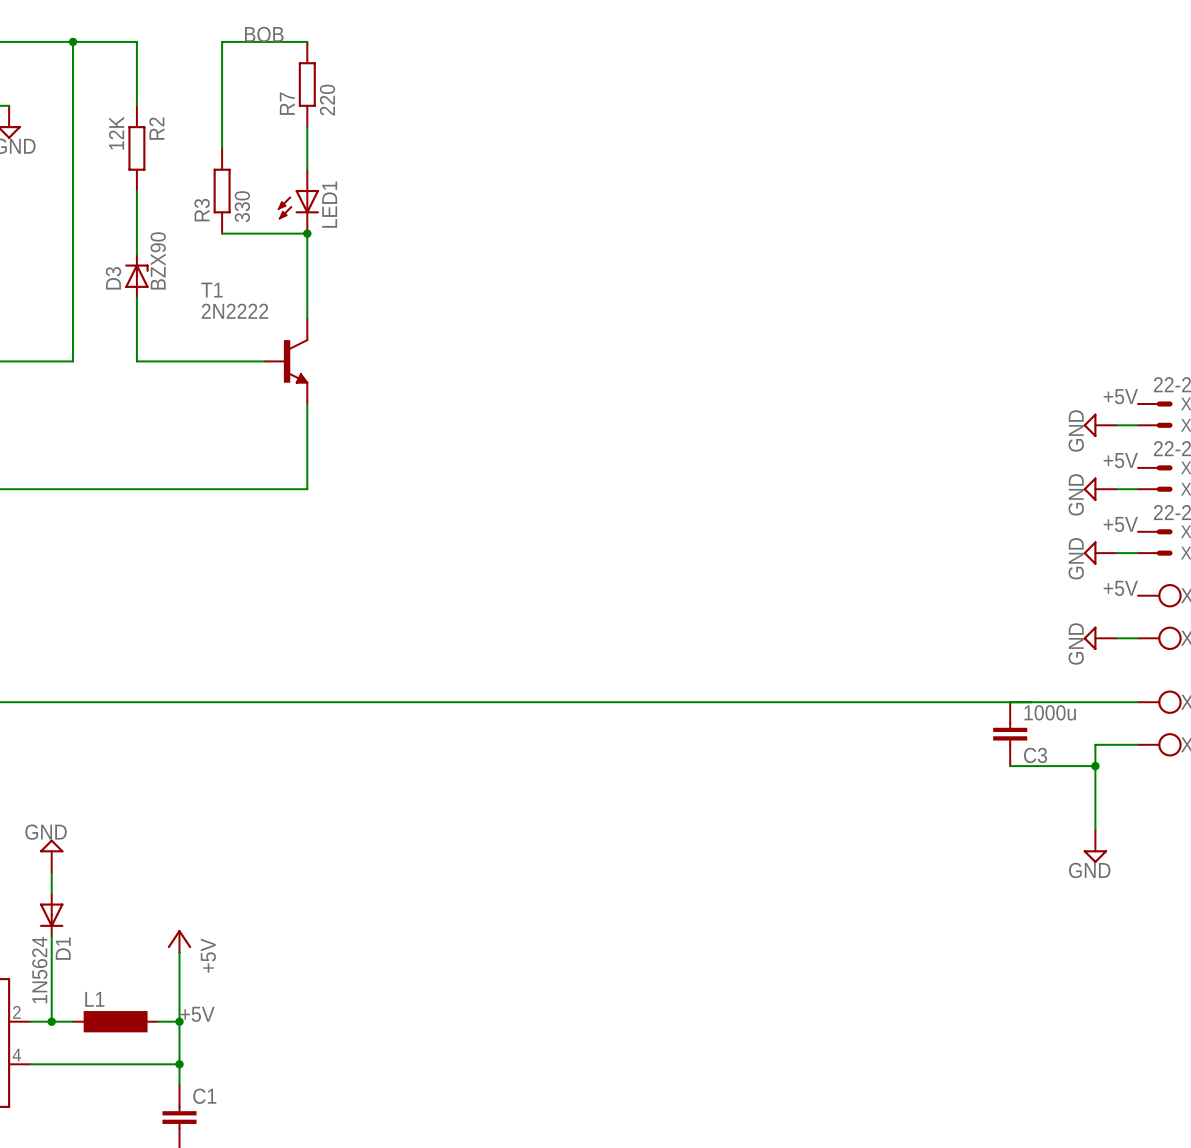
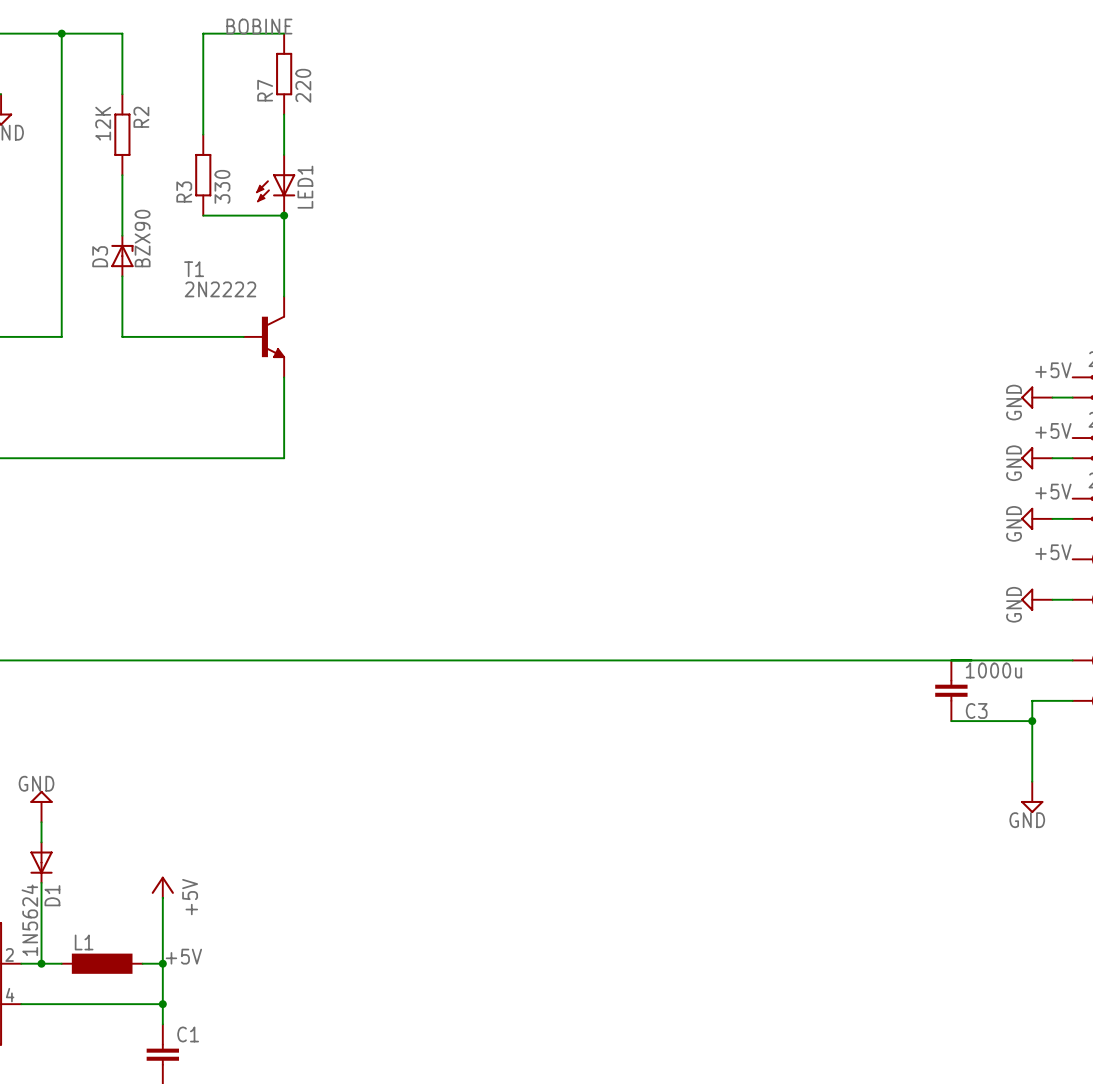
label: BOB (264, 34) -> BOBINE (259, 26)

